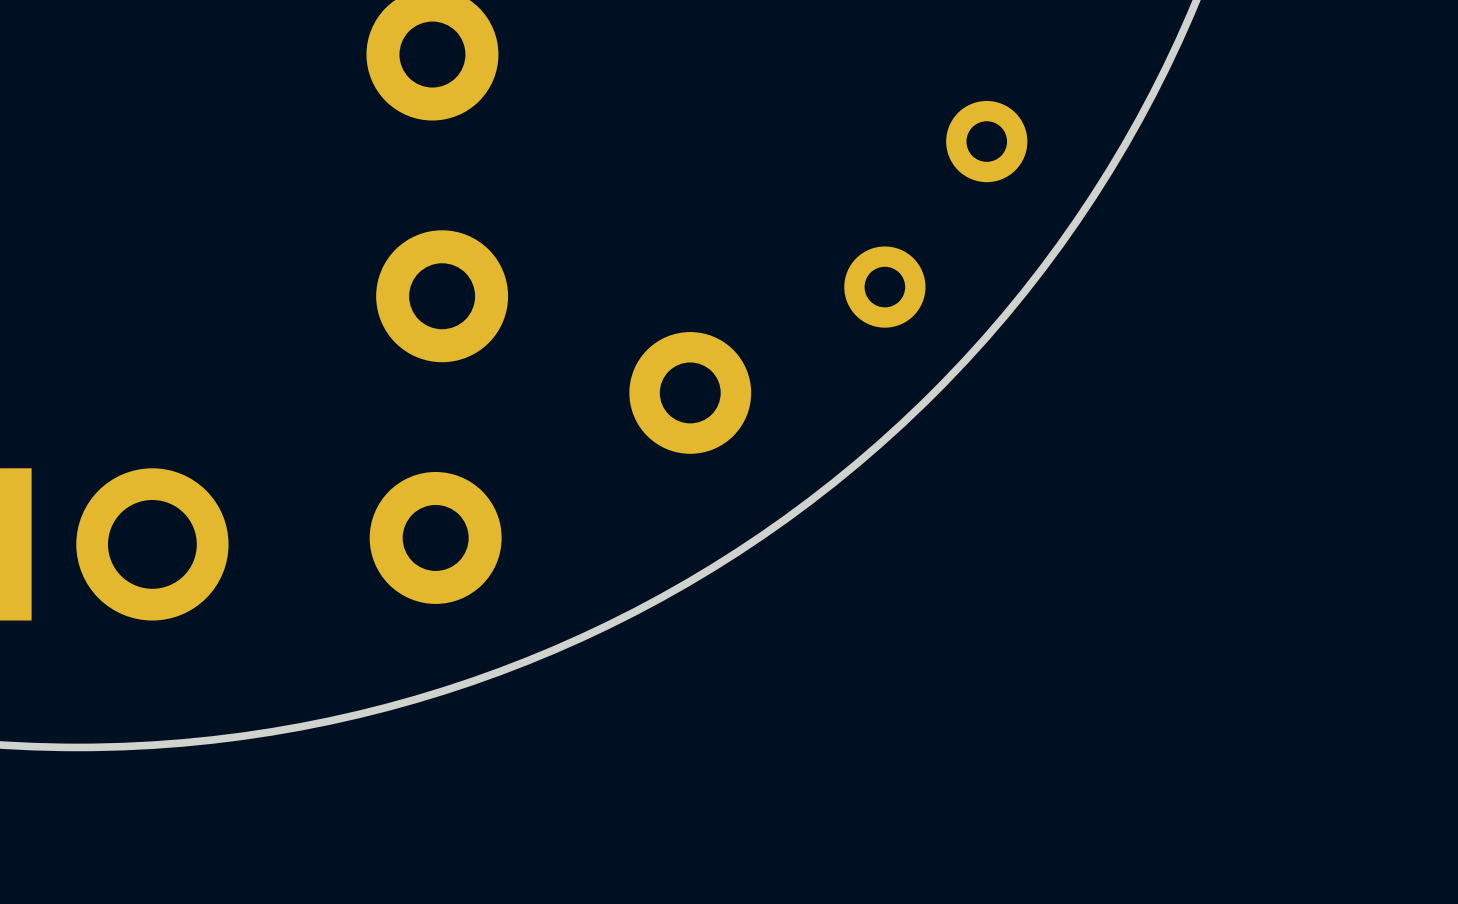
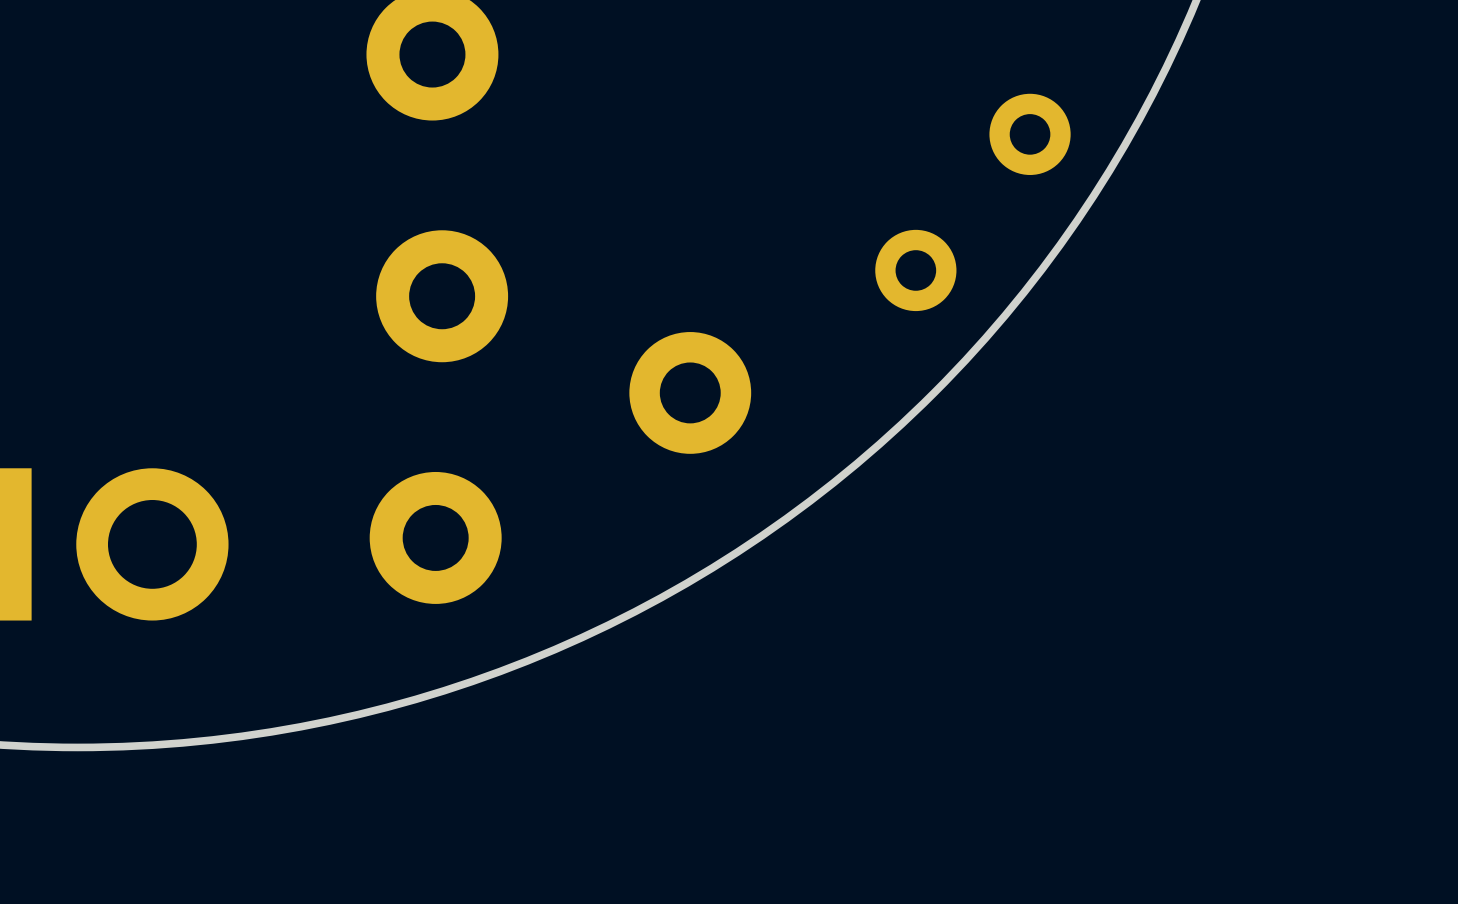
part rotation: 0° (935, 214) -> 5° clockwise (972, 202)

